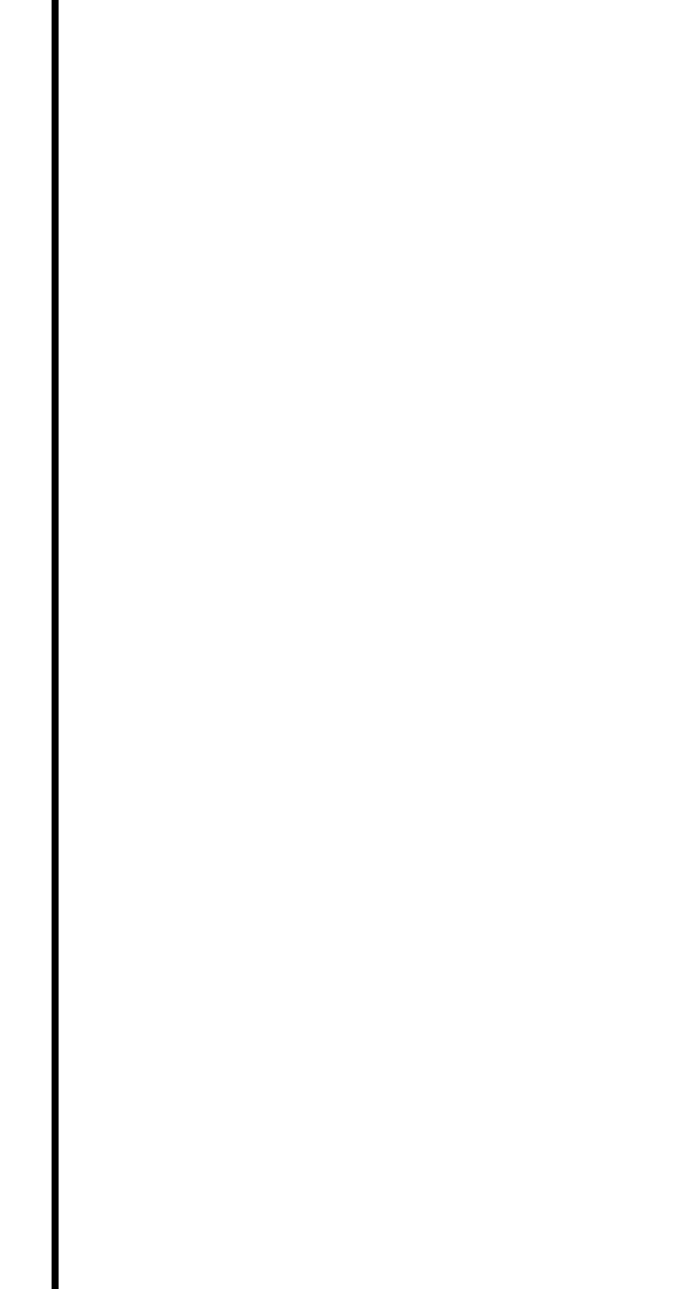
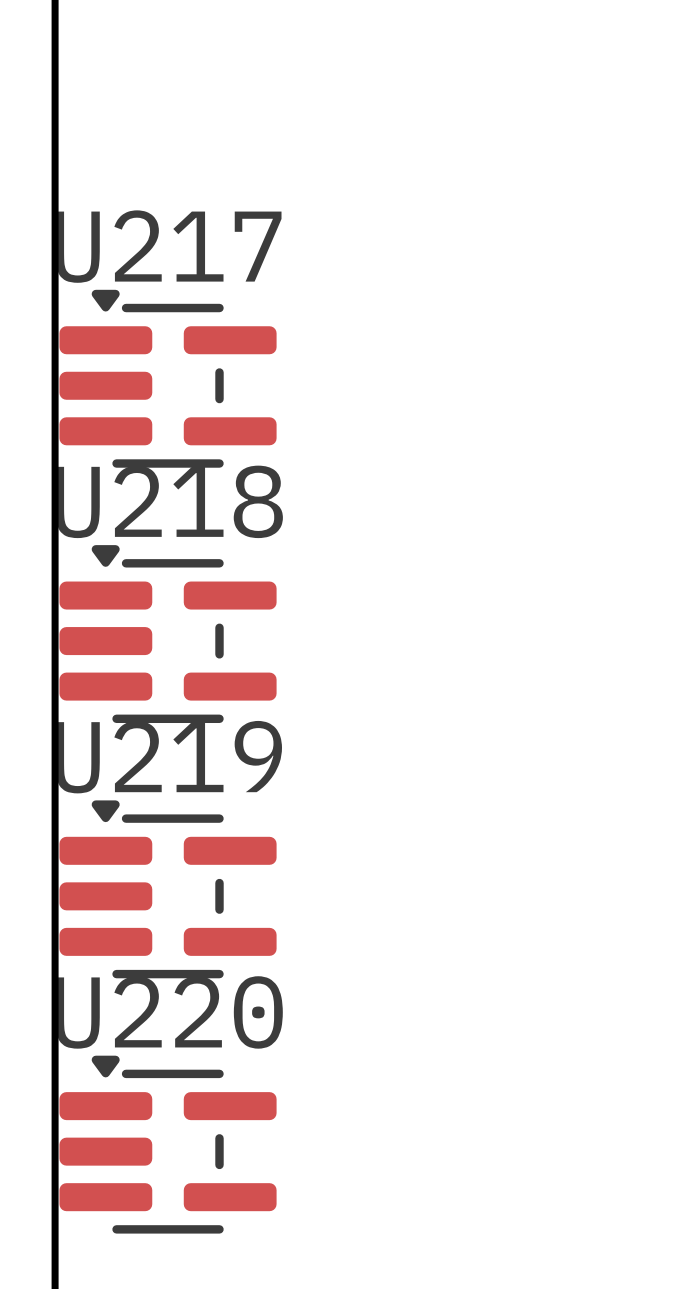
U217: none -> (168, 378)
U218: none -> (168, 634)
U219: none -> (168, 889)
U220: none -> (168, 1144)

